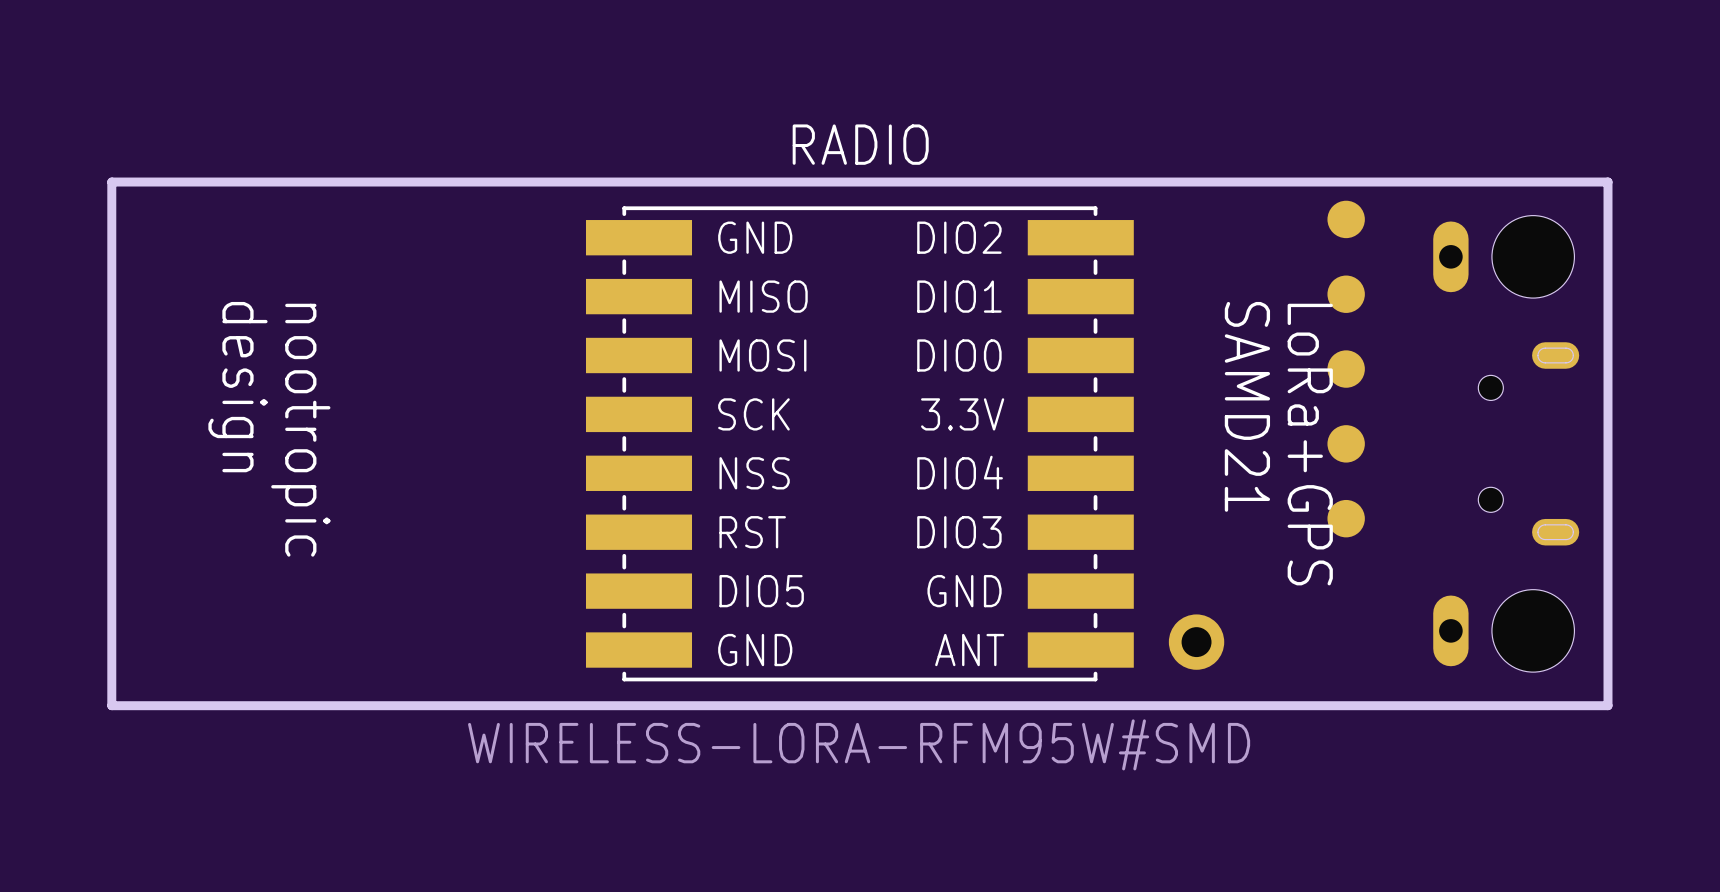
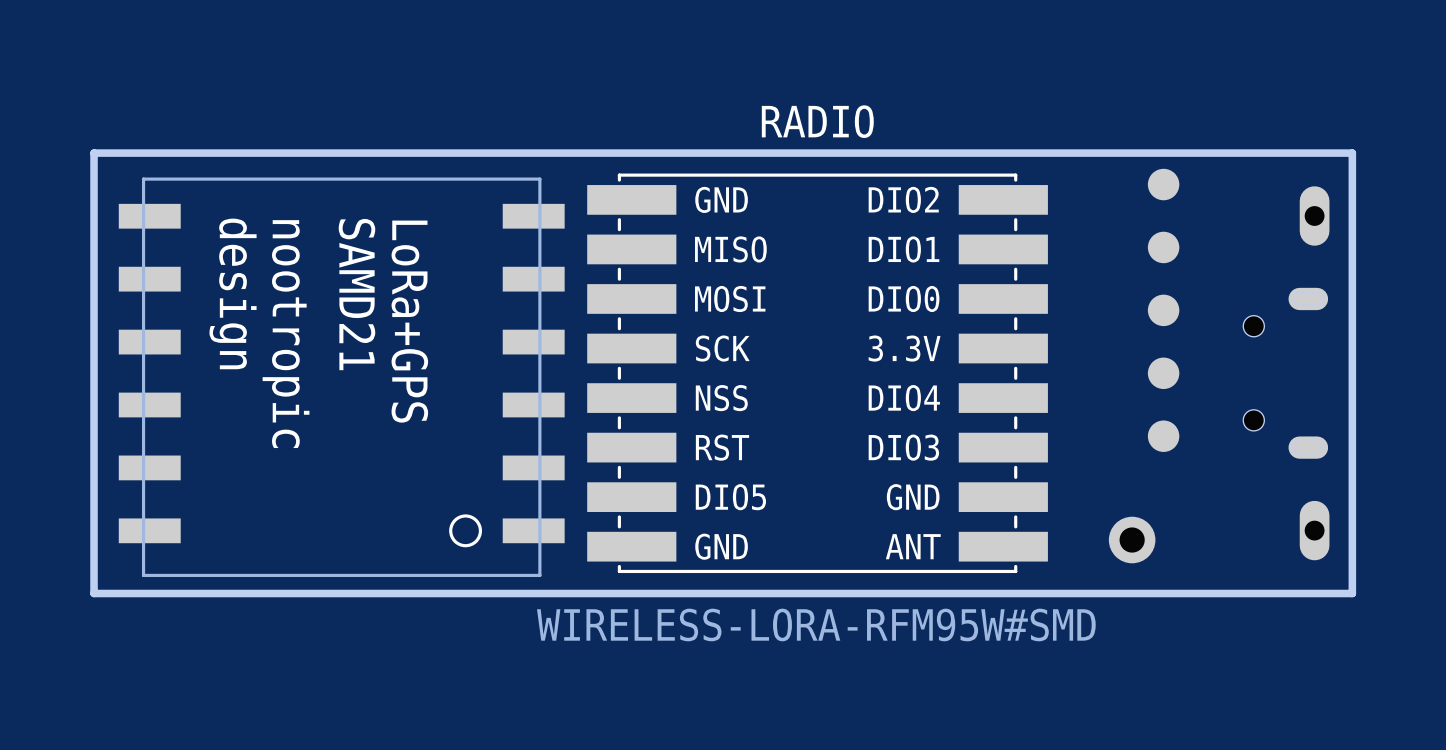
part position: (1346, 219) -> (1163, 184)
part position: (1450, 256) -> (1314, 216)
hole: (1533, 256) -> none
part position: (1346, 294) -> (1163, 247)
text: none -> SAMD21 (356, 294)
part position: (1346, 369) -> (1163, 310)
text position: design (237, 387) -> design (233, 293)
text: SAMD21 (1247, 406) -> none
text: none -> LoRa+GPS (409, 321)
text position: nootropic (300, 430) -> nootropic (286, 334)
RADIO position: (859, 443) -> (817, 373)
part position: (1346, 443) -> (1163, 373)
text: LoRa+GPS (1310, 444) -> none
part: none -> (341, 377)
part position: (1346, 518) -> (1163, 436)
part position: (1450, 630) -> (1314, 530)
hole: (1533, 630) -> none
part position: (1196, 642) -> (1132, 540)

